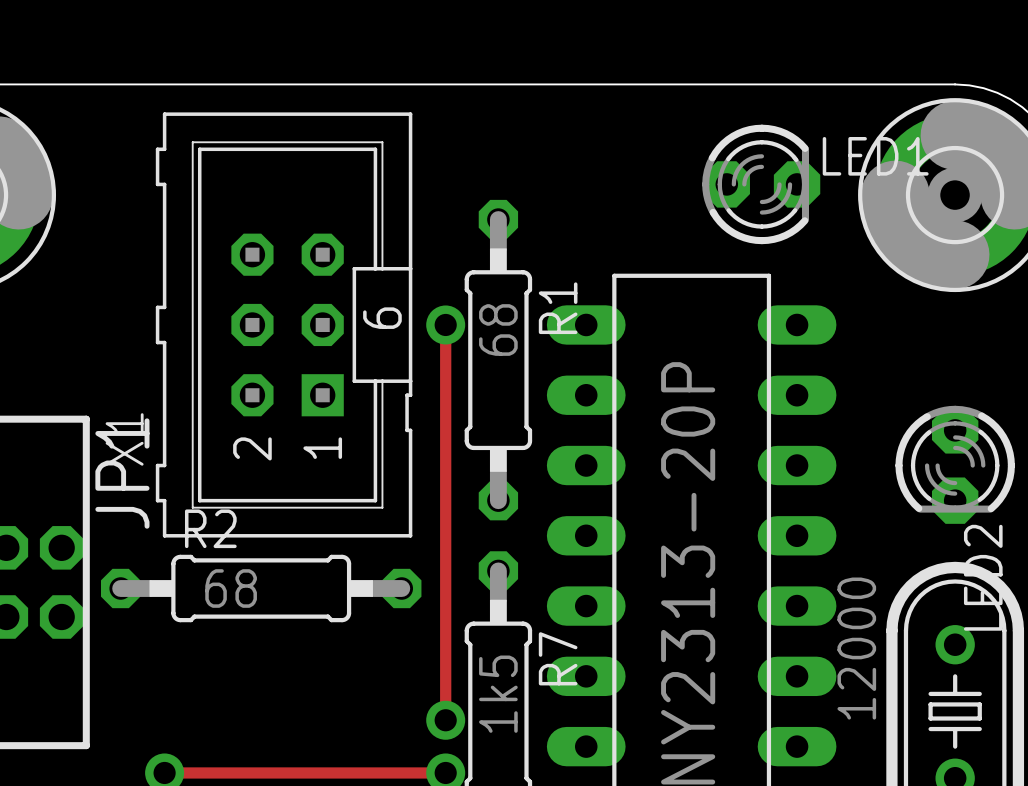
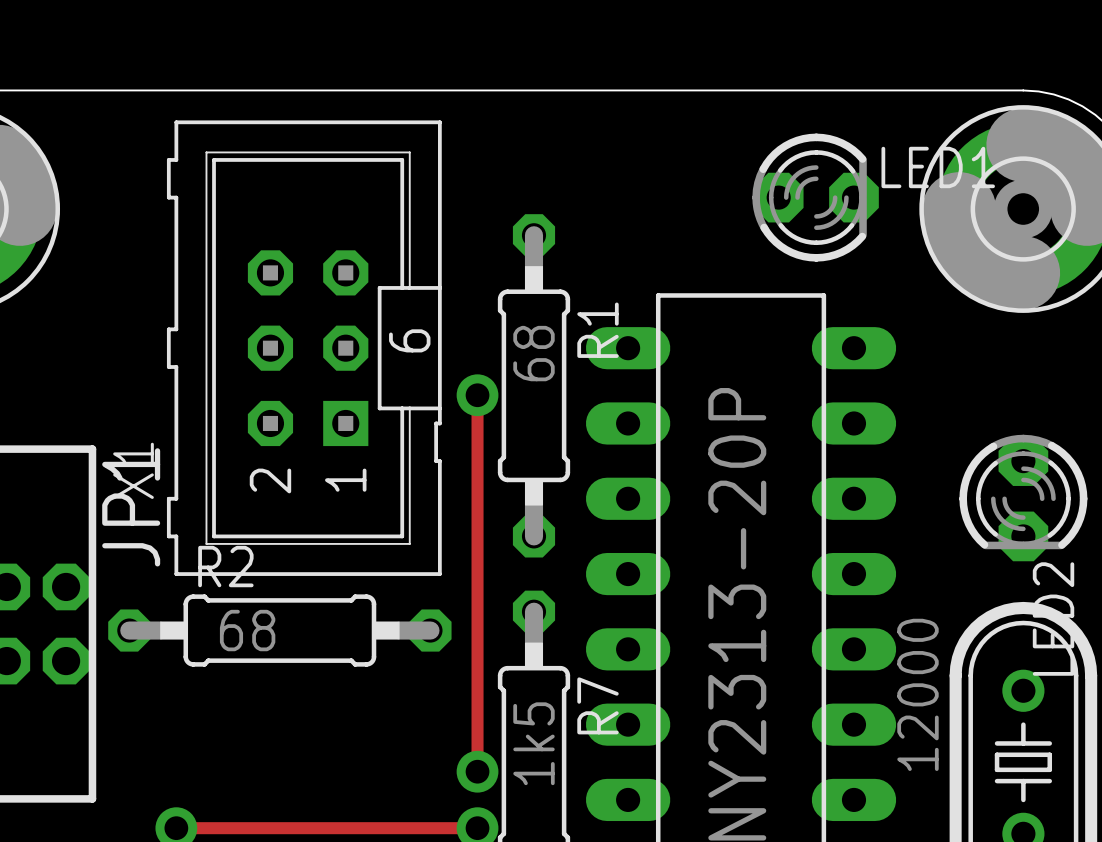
track: (445, 324) (445, 368) -> none
via position: (445, 324) -> (477, 395)

